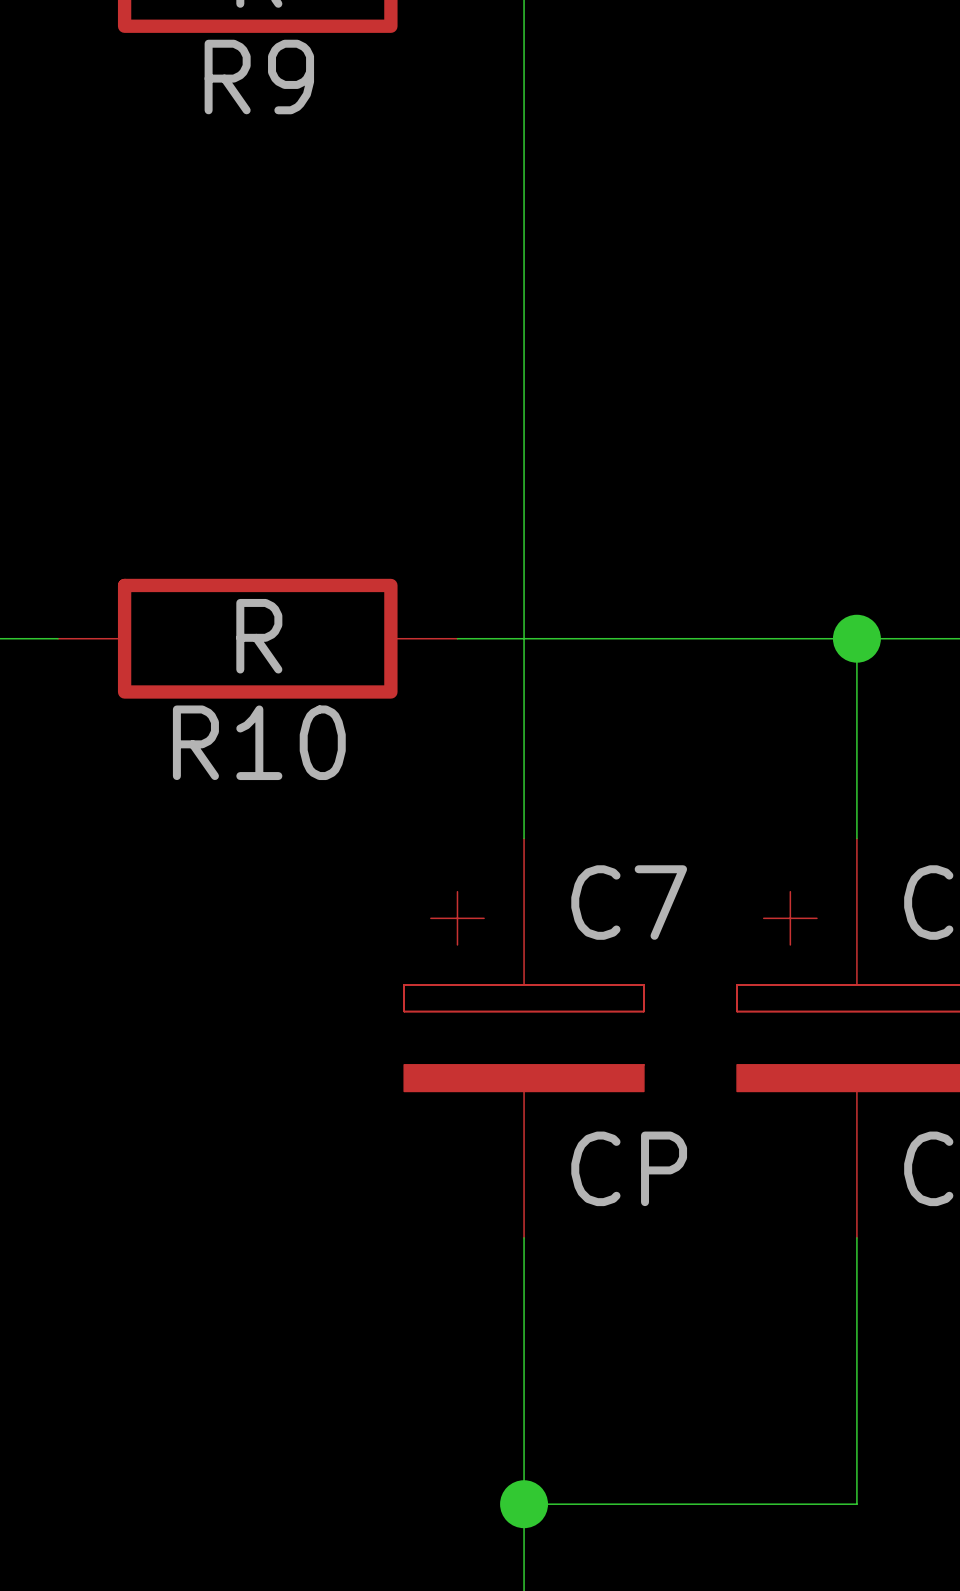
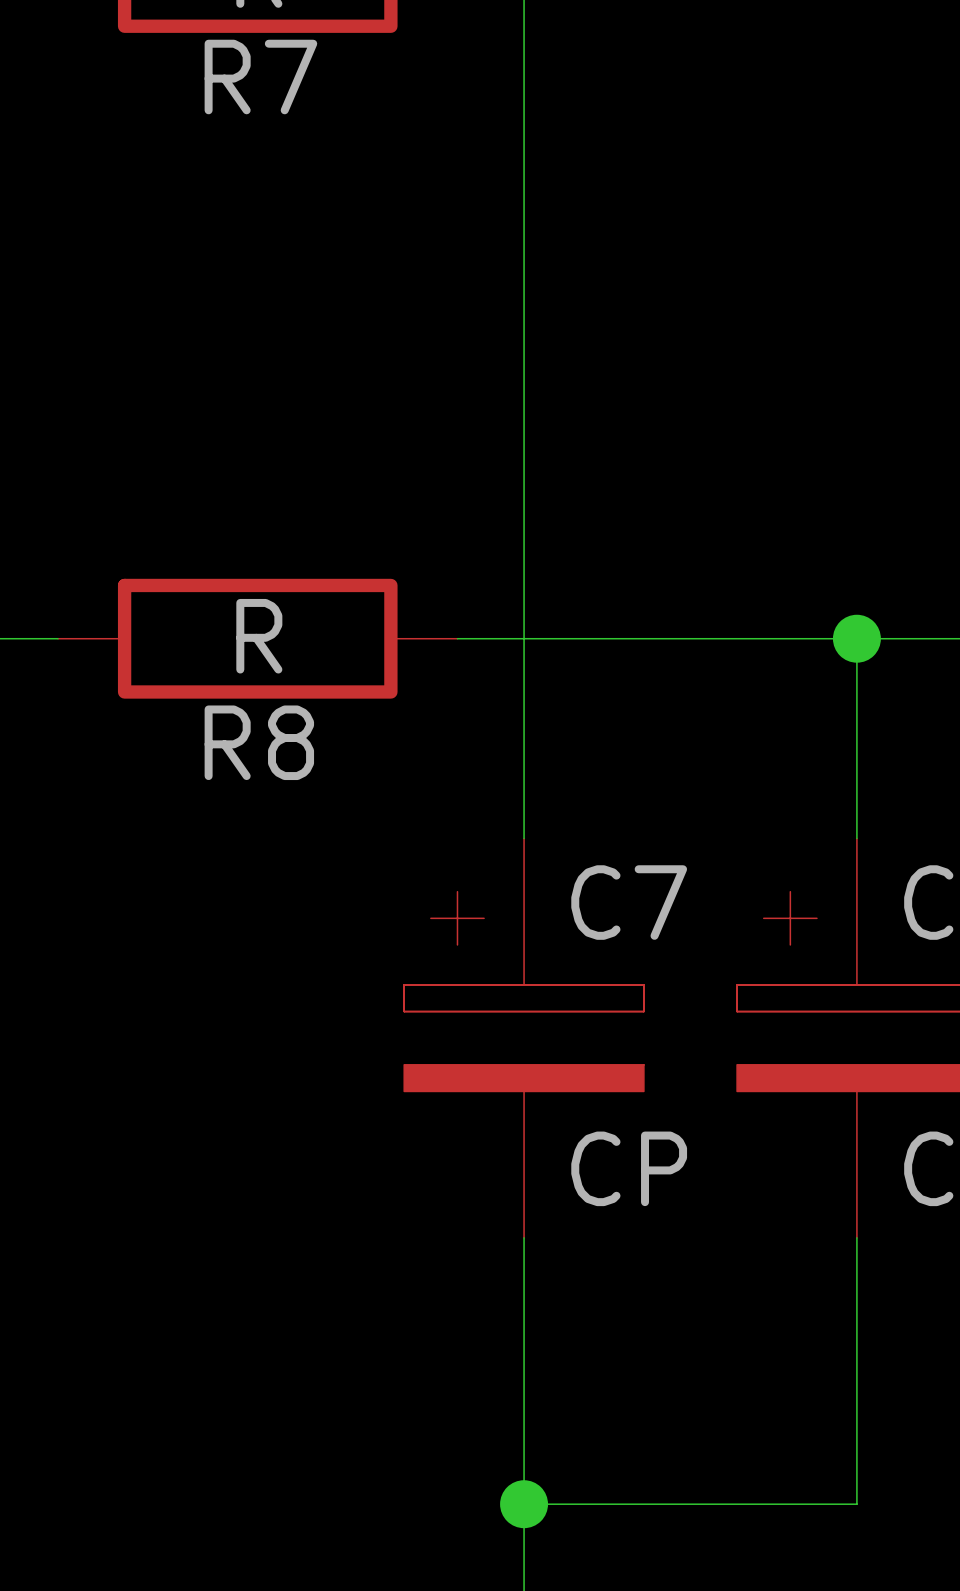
R9 name: R9 (259, 77) -> R7 (260, 77)
R10 name: R10 (259, 742) -> R8 (259, 742)

